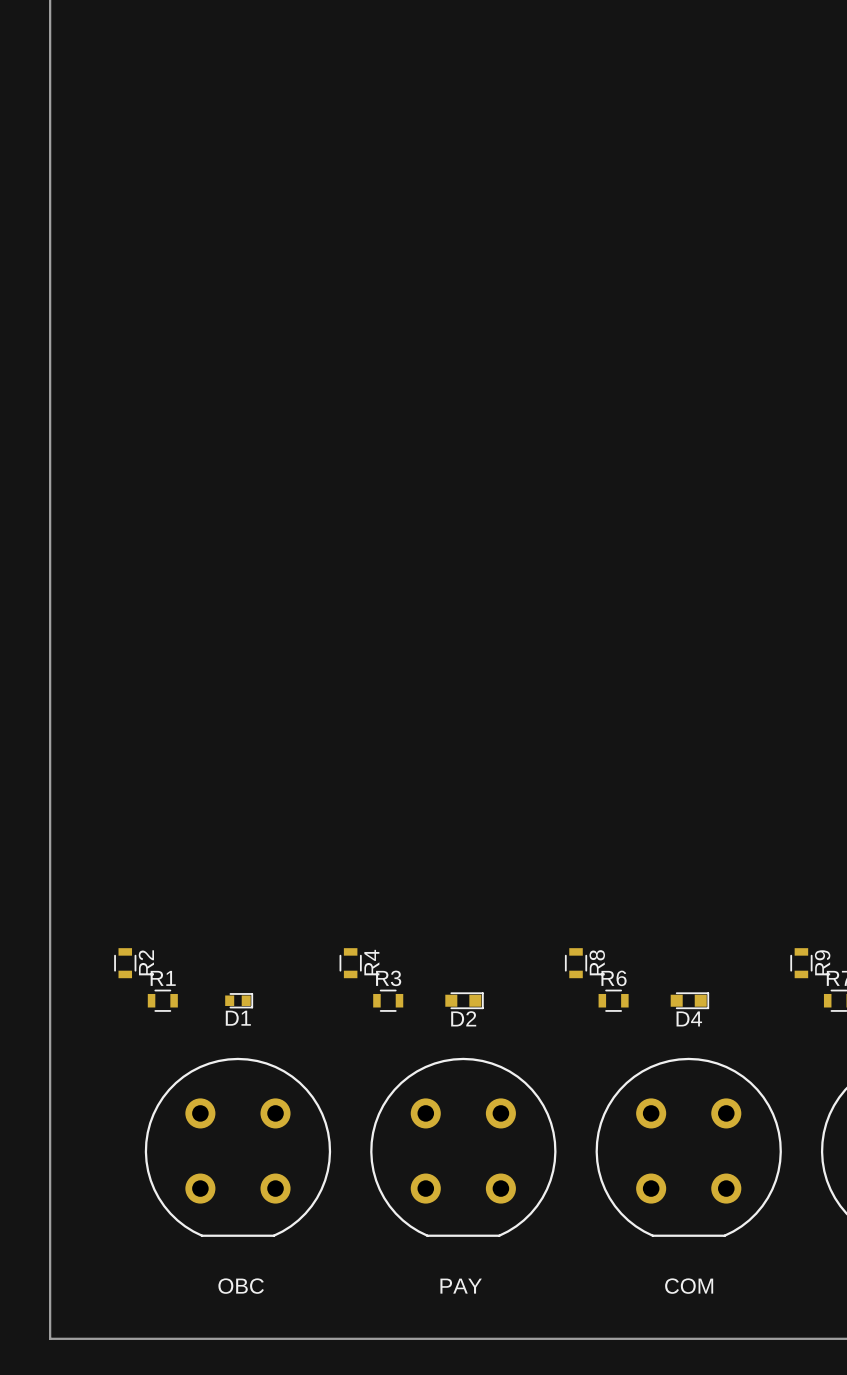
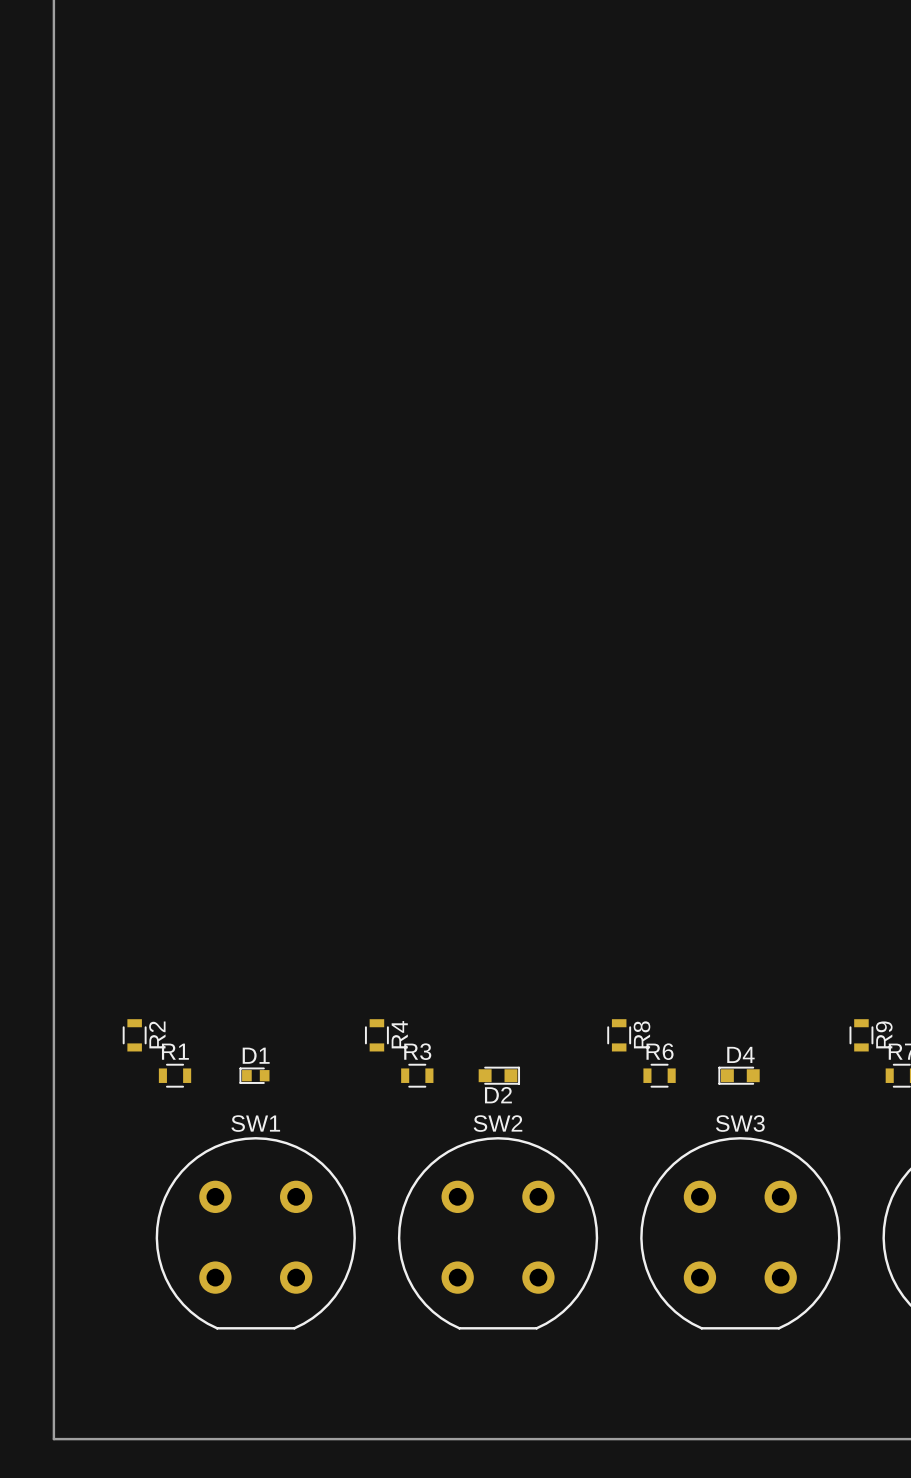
D1 rotation: 0° (239, 1000) -> 180° (254, 1075)
D4 rotation: 0° (689, 1000) -> 180° (739, 1075)
OBC name: OBC (241, 1286) -> SW1 (255, 1123)
PAY name: PAY (461, 1286) -> SW2 (497, 1123)
COM name: COM (689, 1286) -> SW3 (740, 1123)

